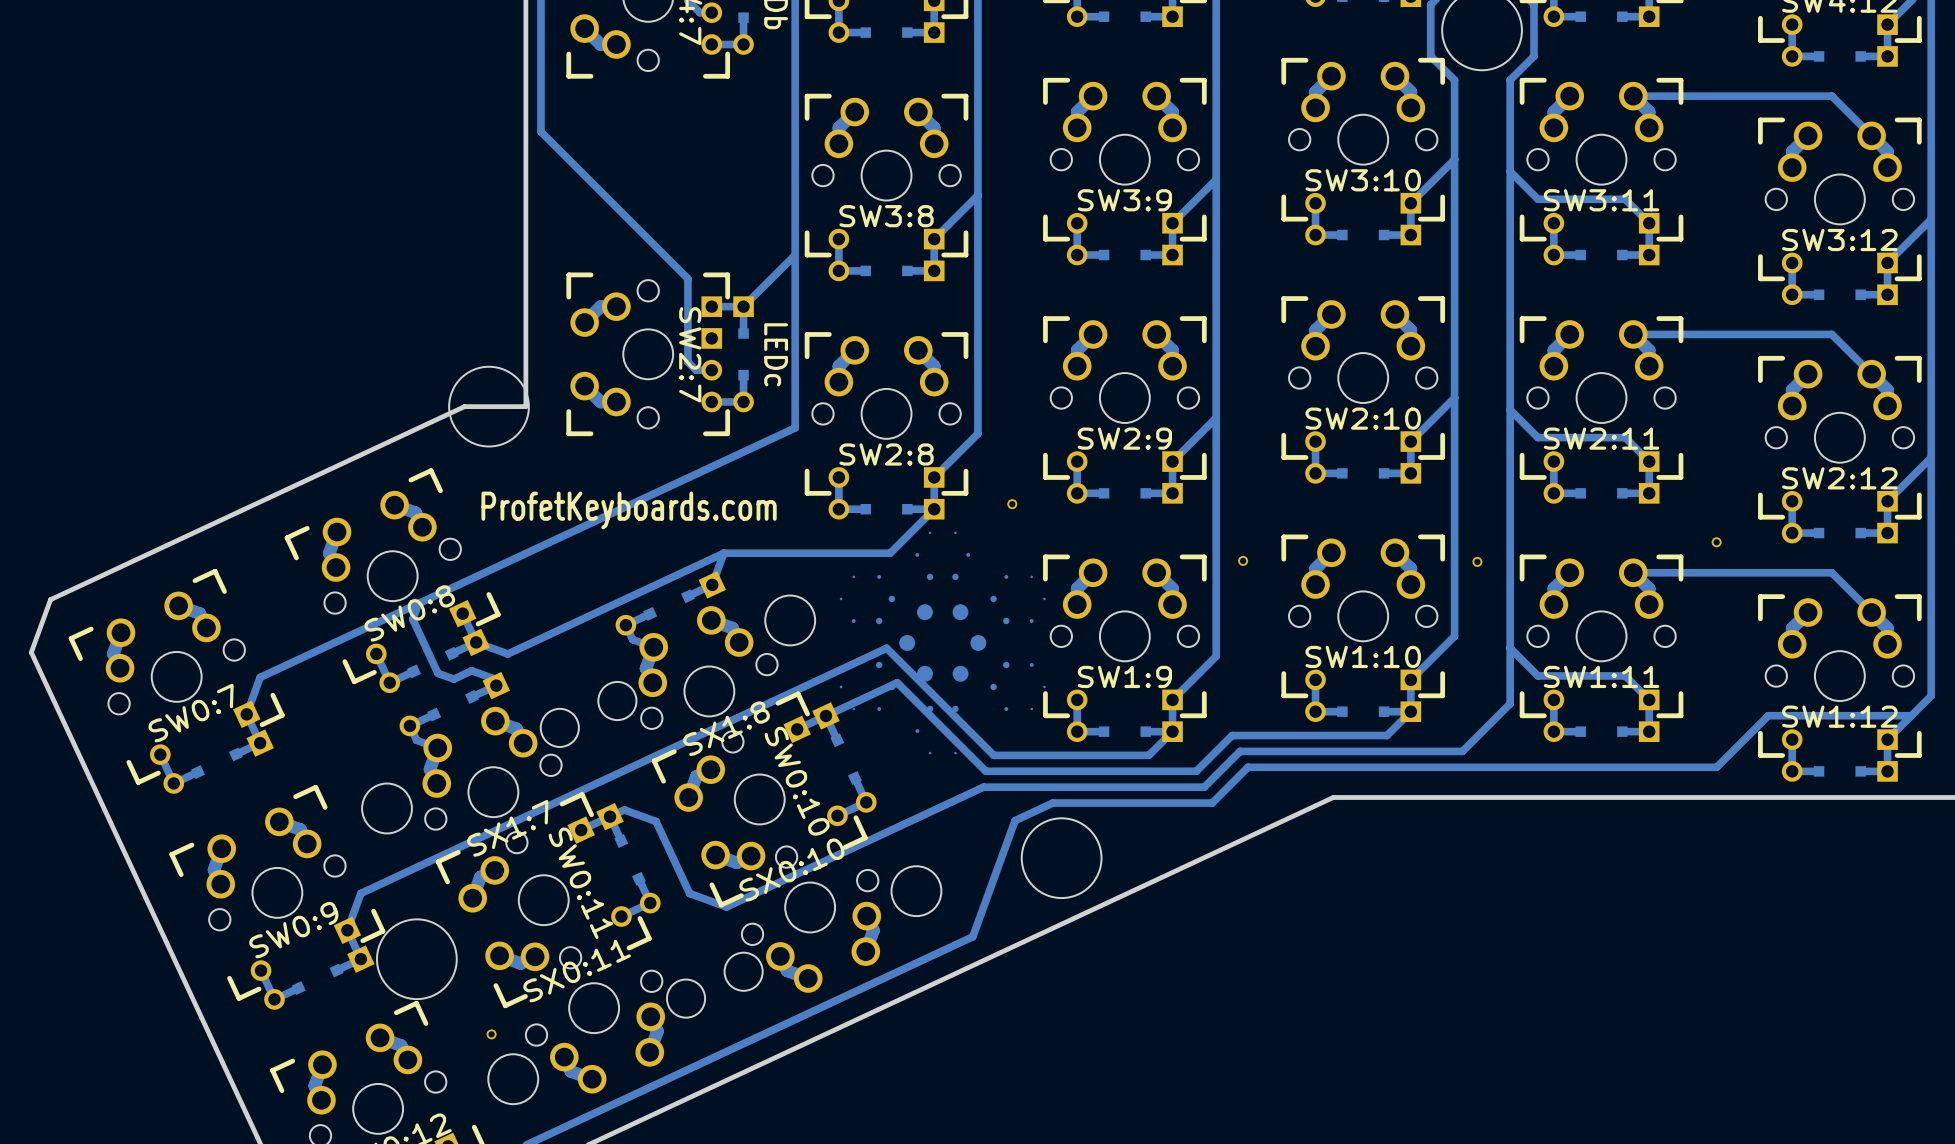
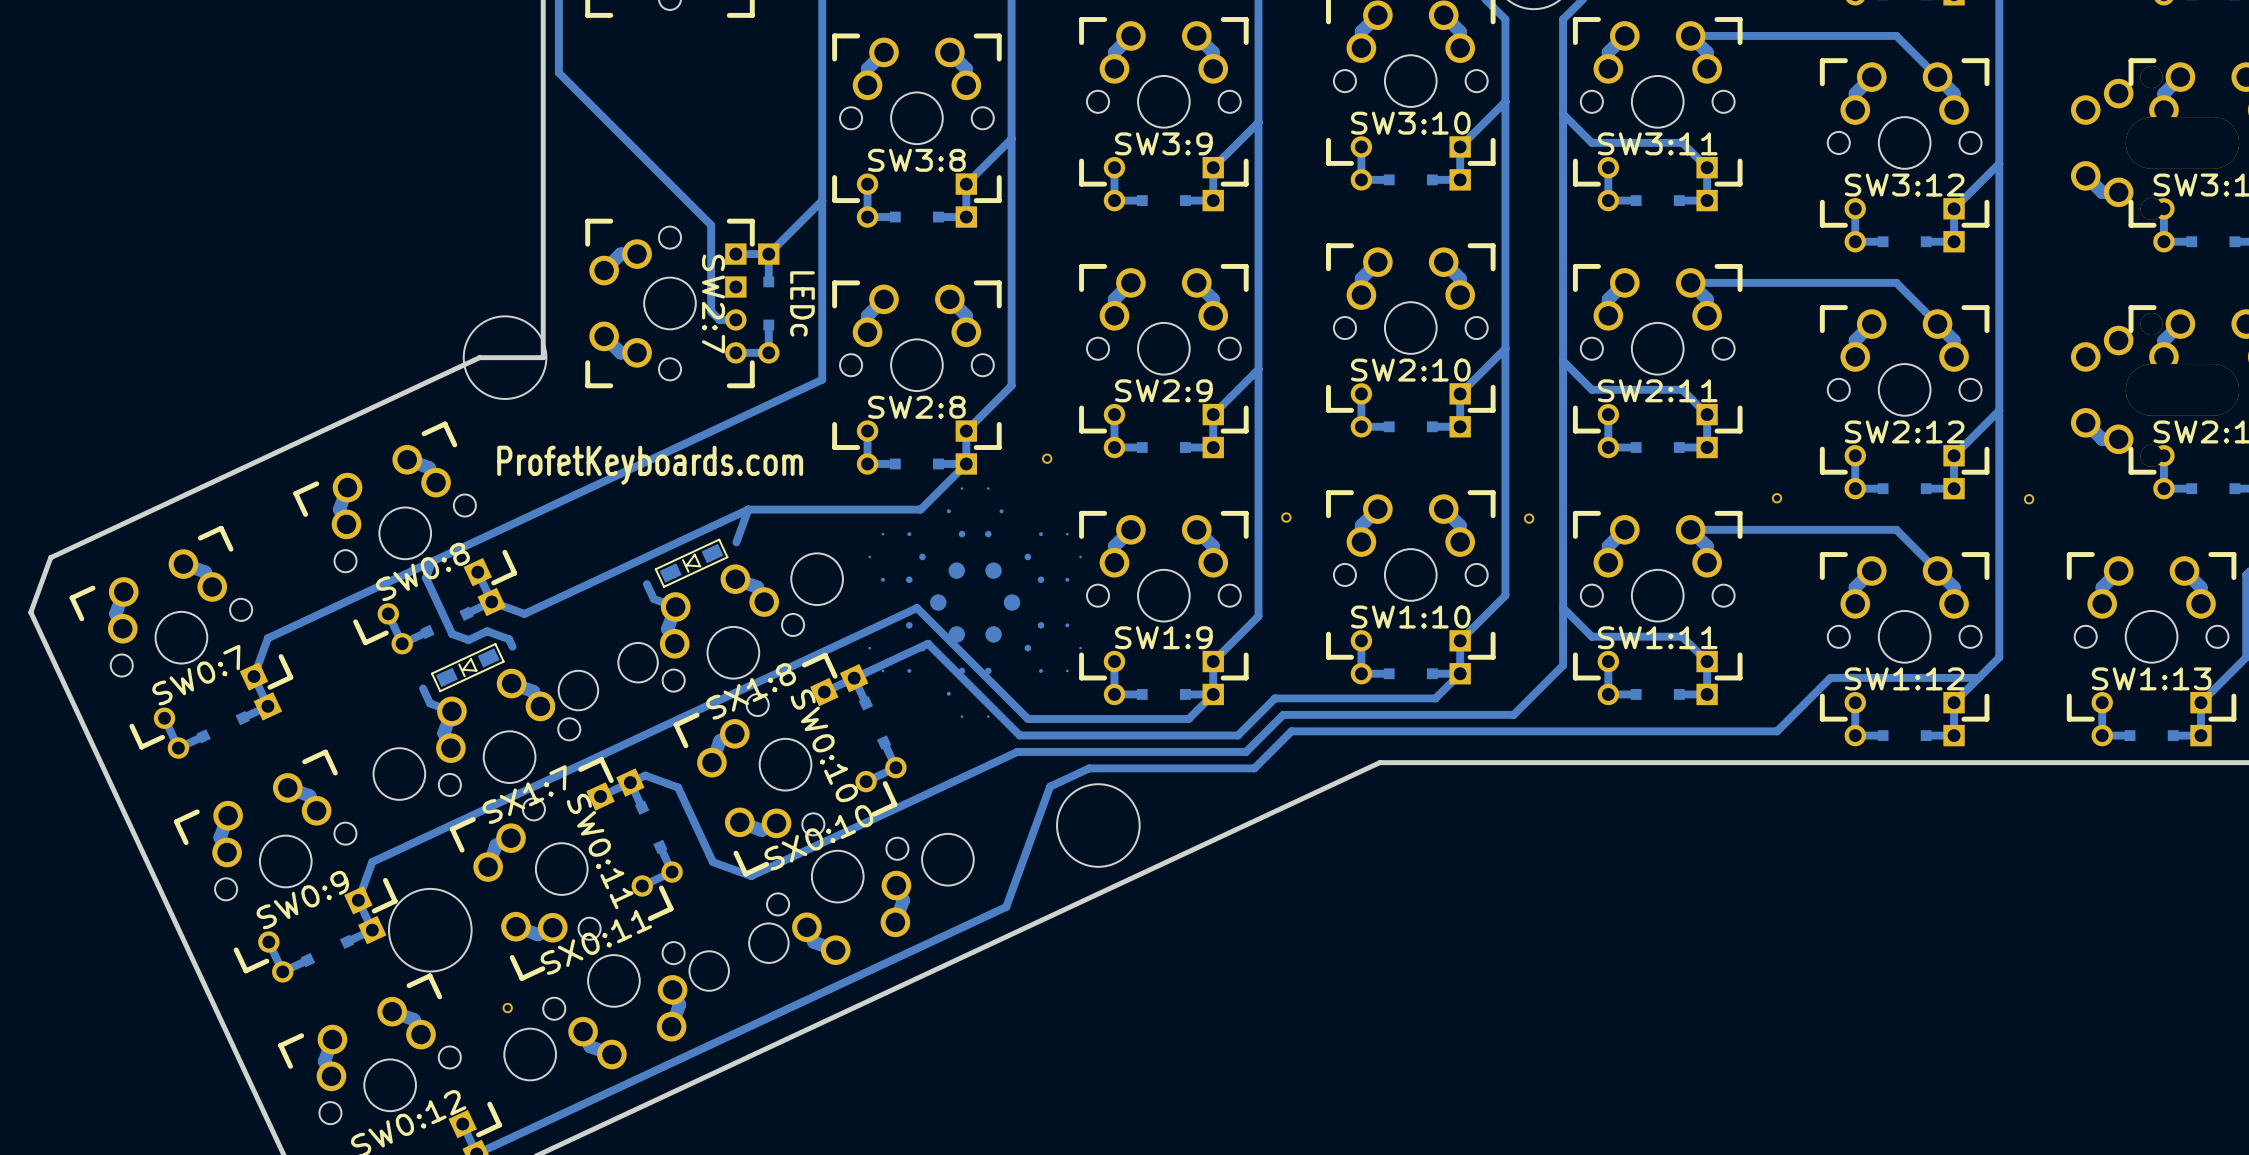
part footprint: [615, 571, 727, 636] -> [654, 538, 729, 588]
part footprint: [399, 671, 511, 737] -> [431, 643, 505, 693]

